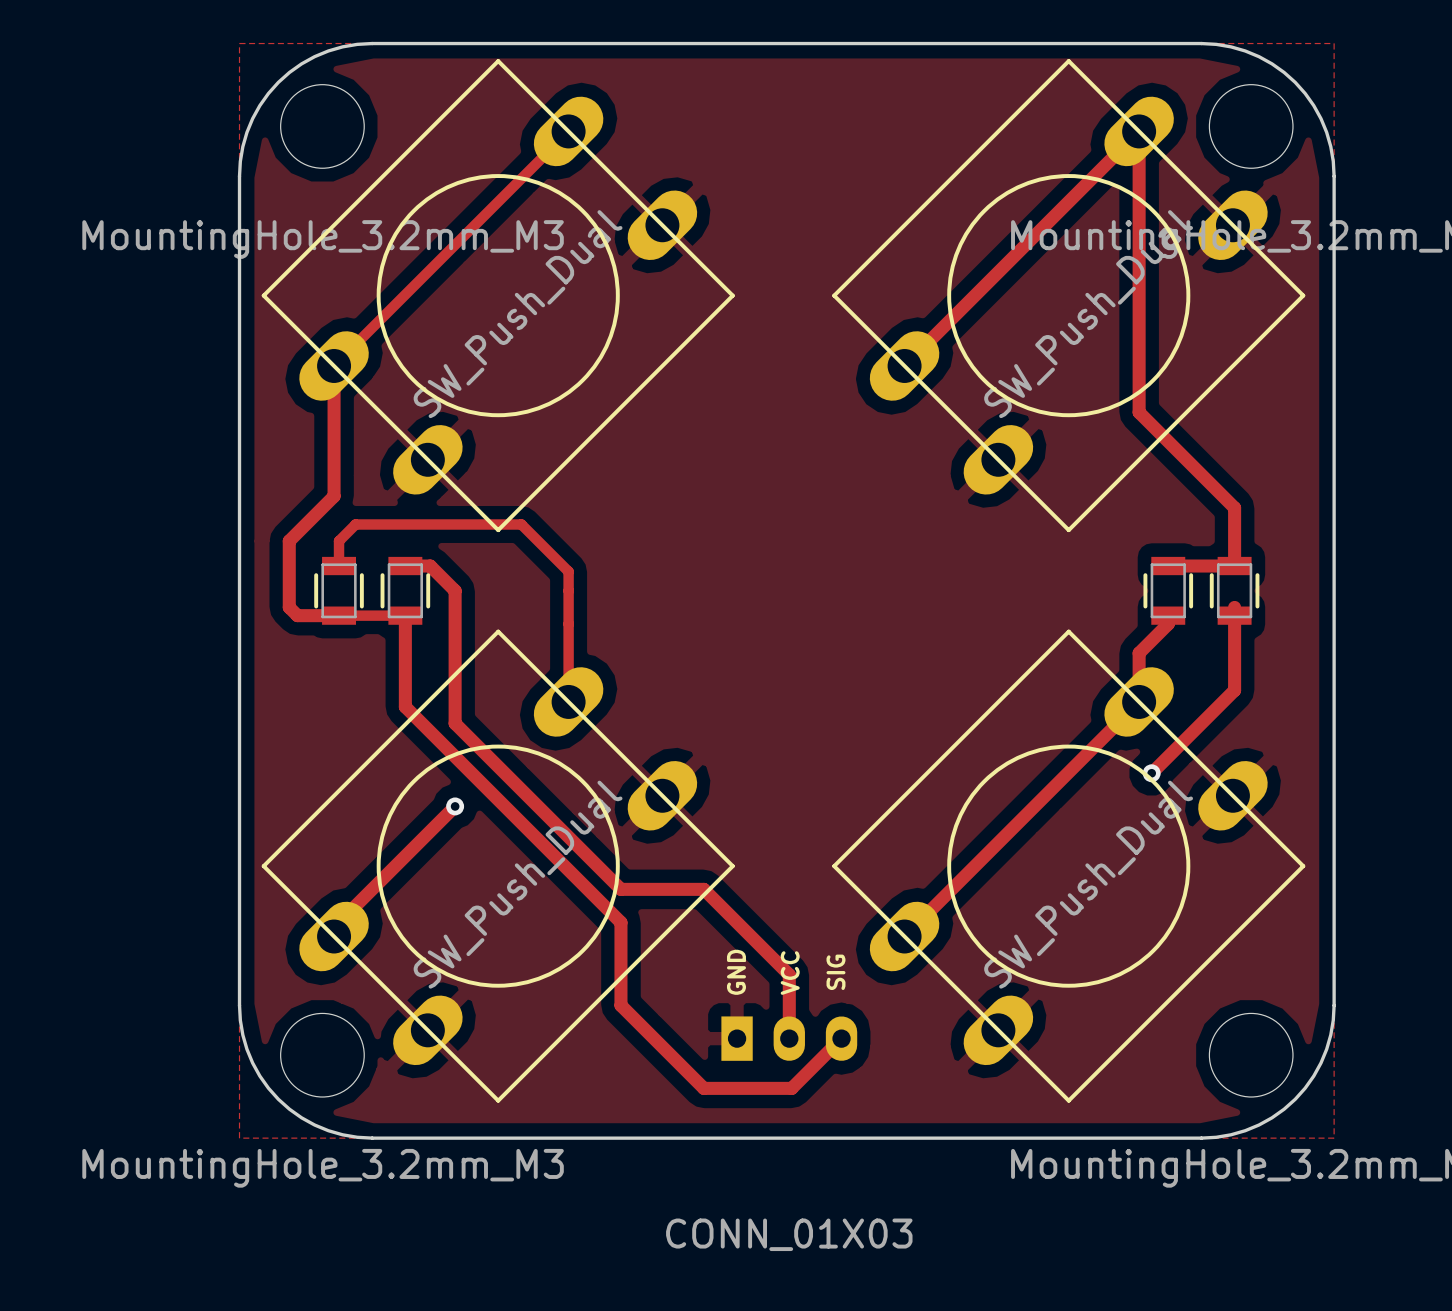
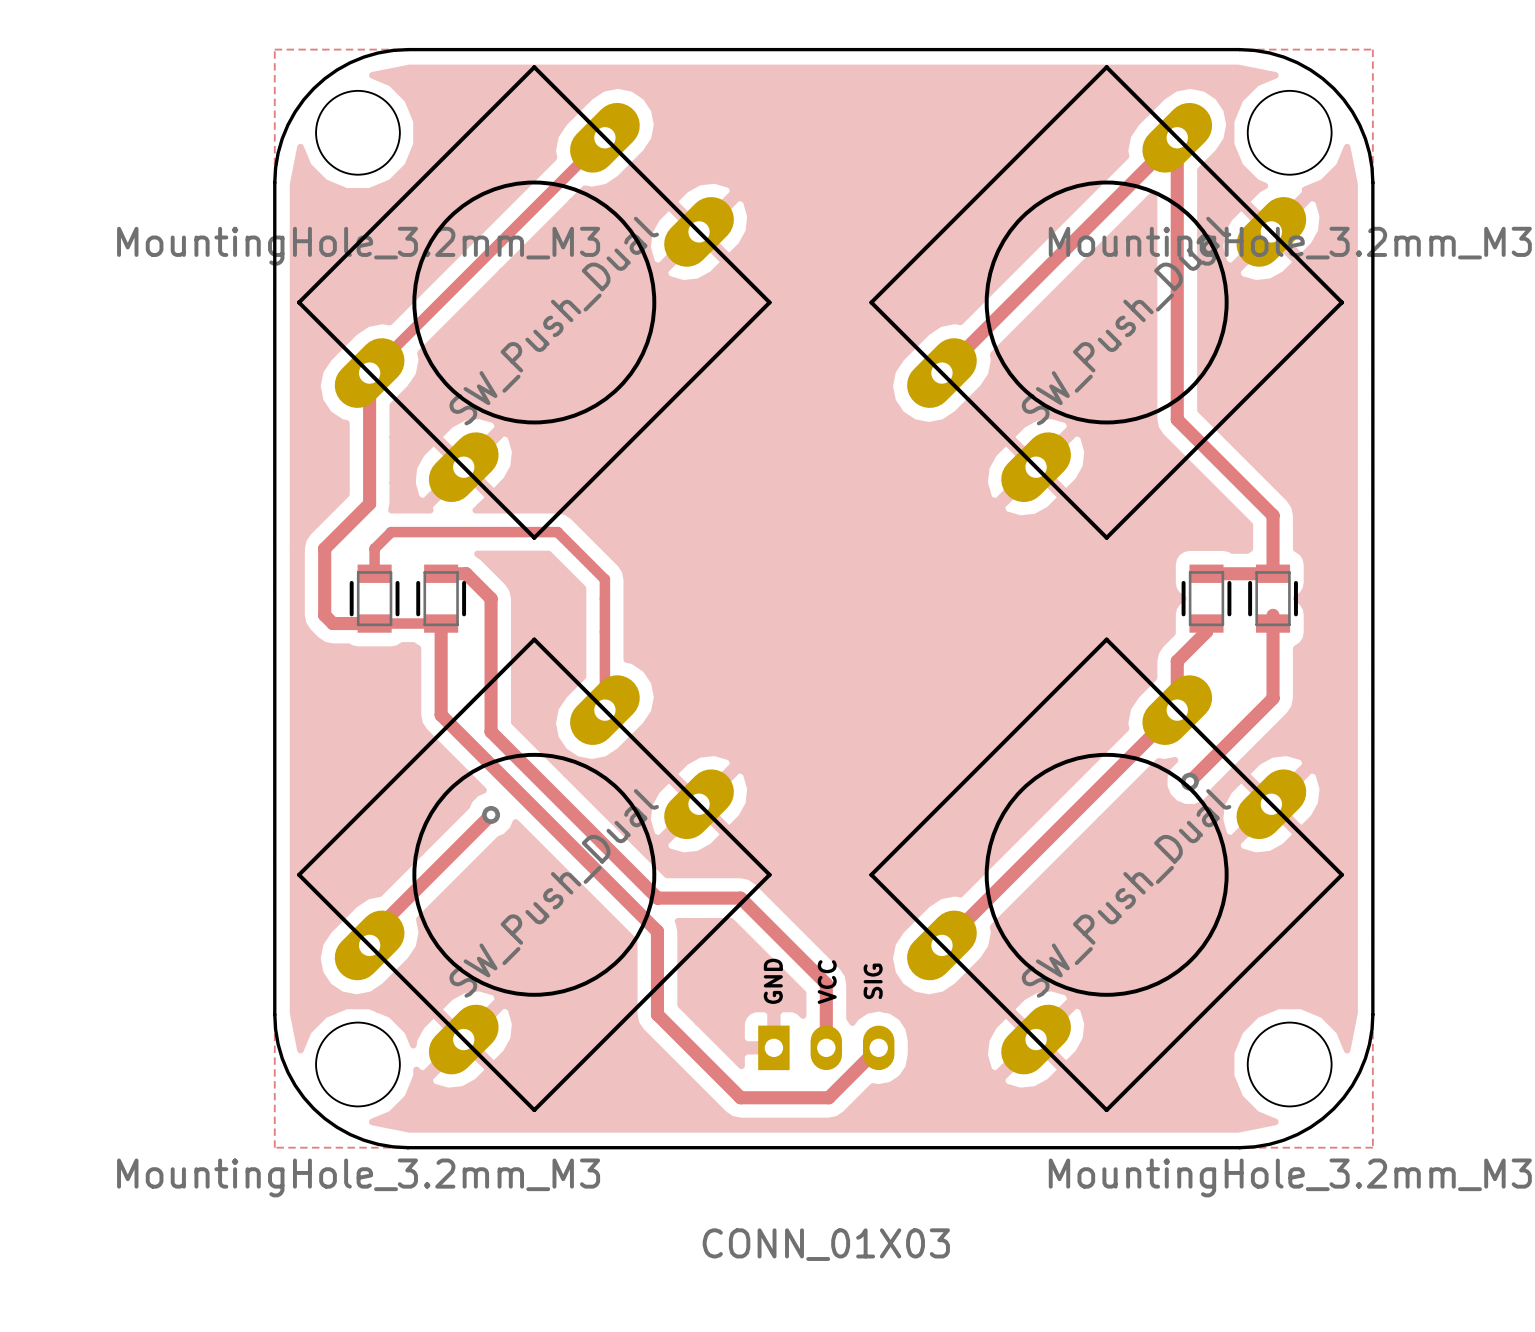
part footprint: [261, 59, 735, 533] -> [297, 65, 772, 540]
part footprint: [832, 59, 1306, 533] -> [869, 65, 1344, 540]
part footprint: [261, 629, 735, 1103] -> [297, 637, 772, 1113]
part footprint: [832, 629, 1306, 1103] -> [869, 637, 1344, 1113]

